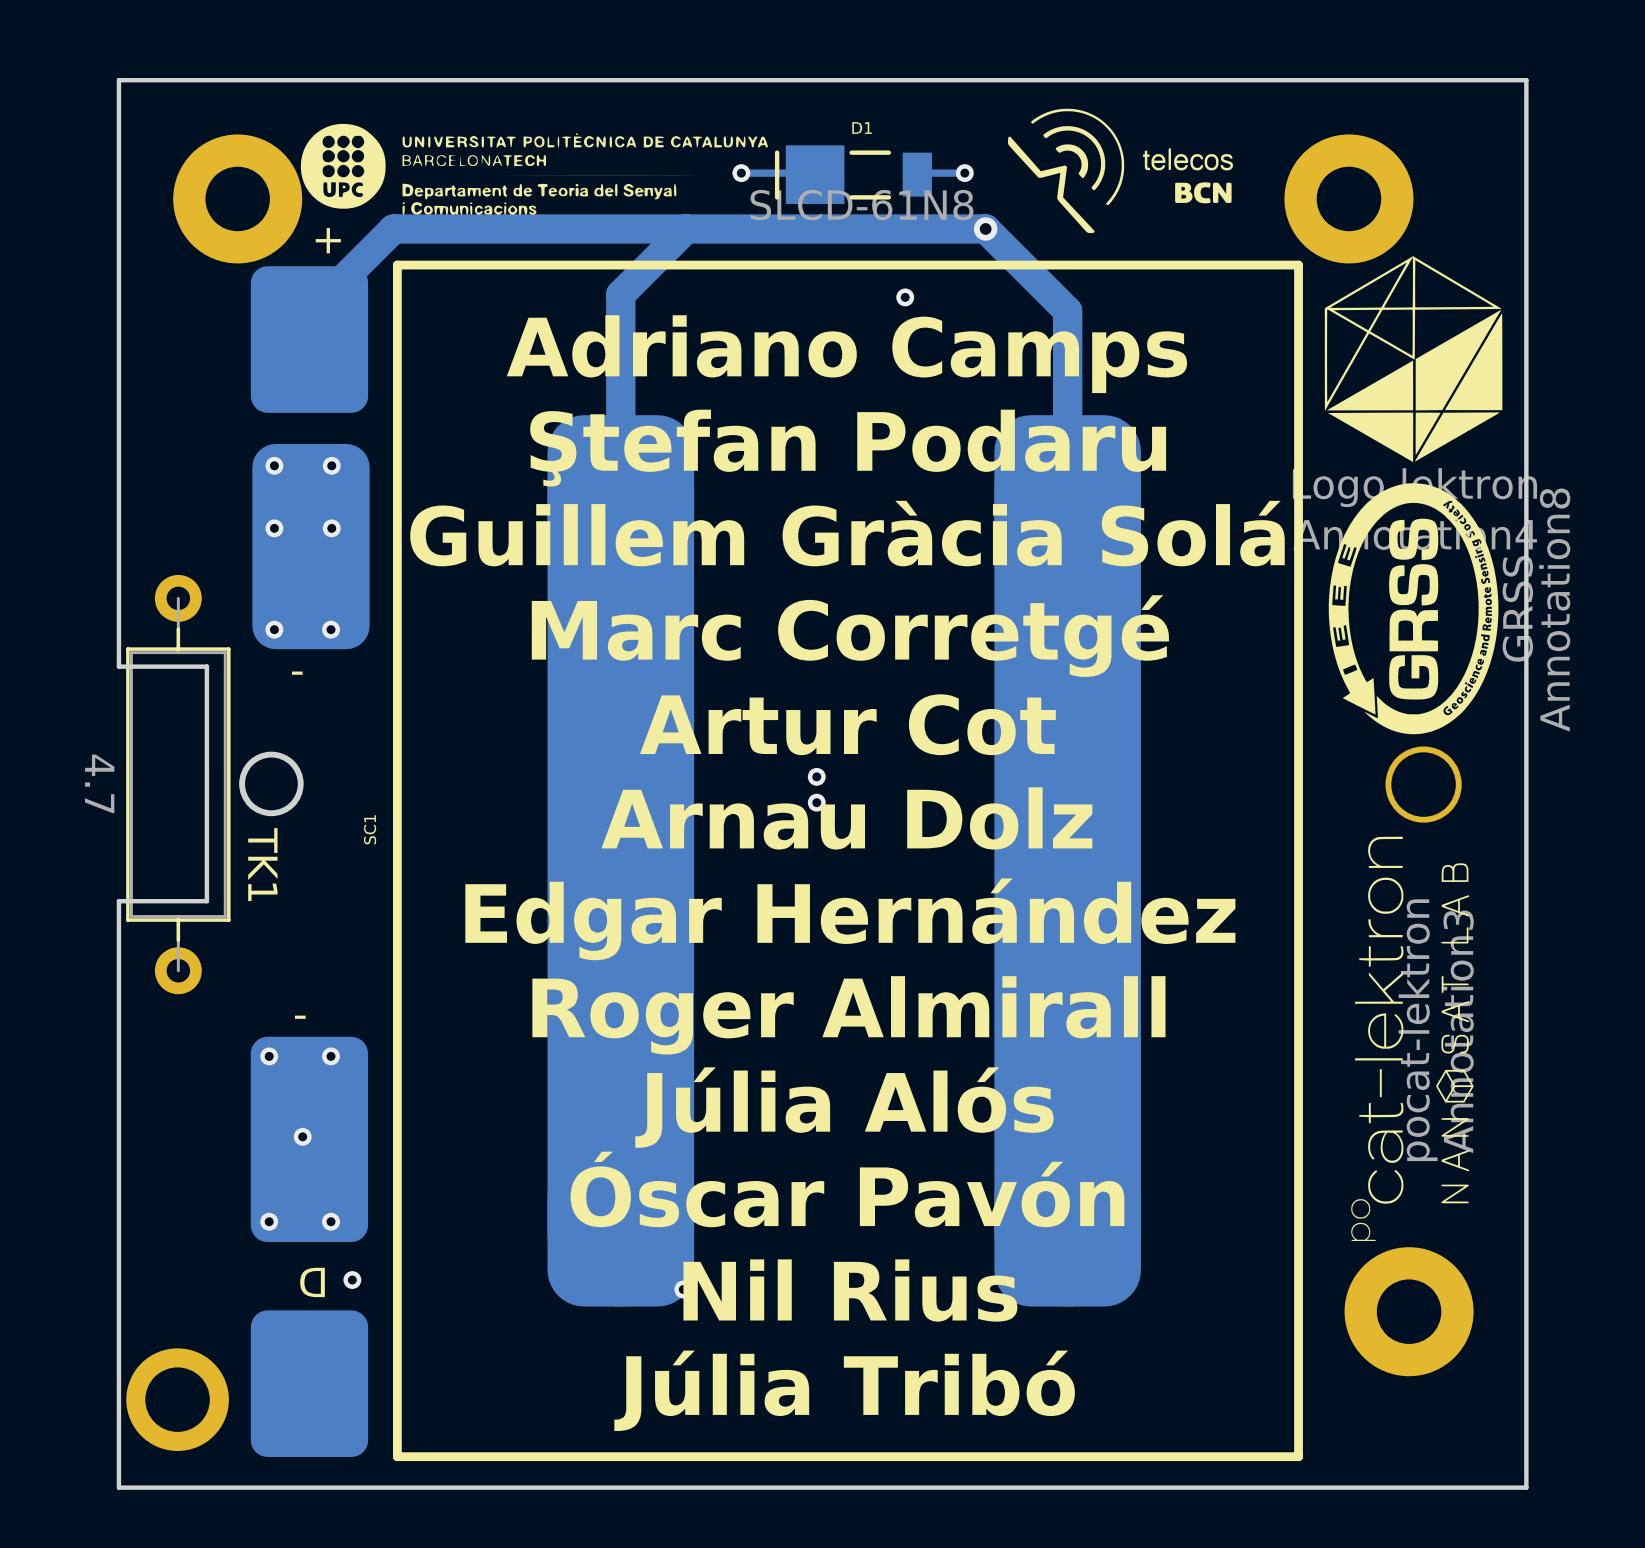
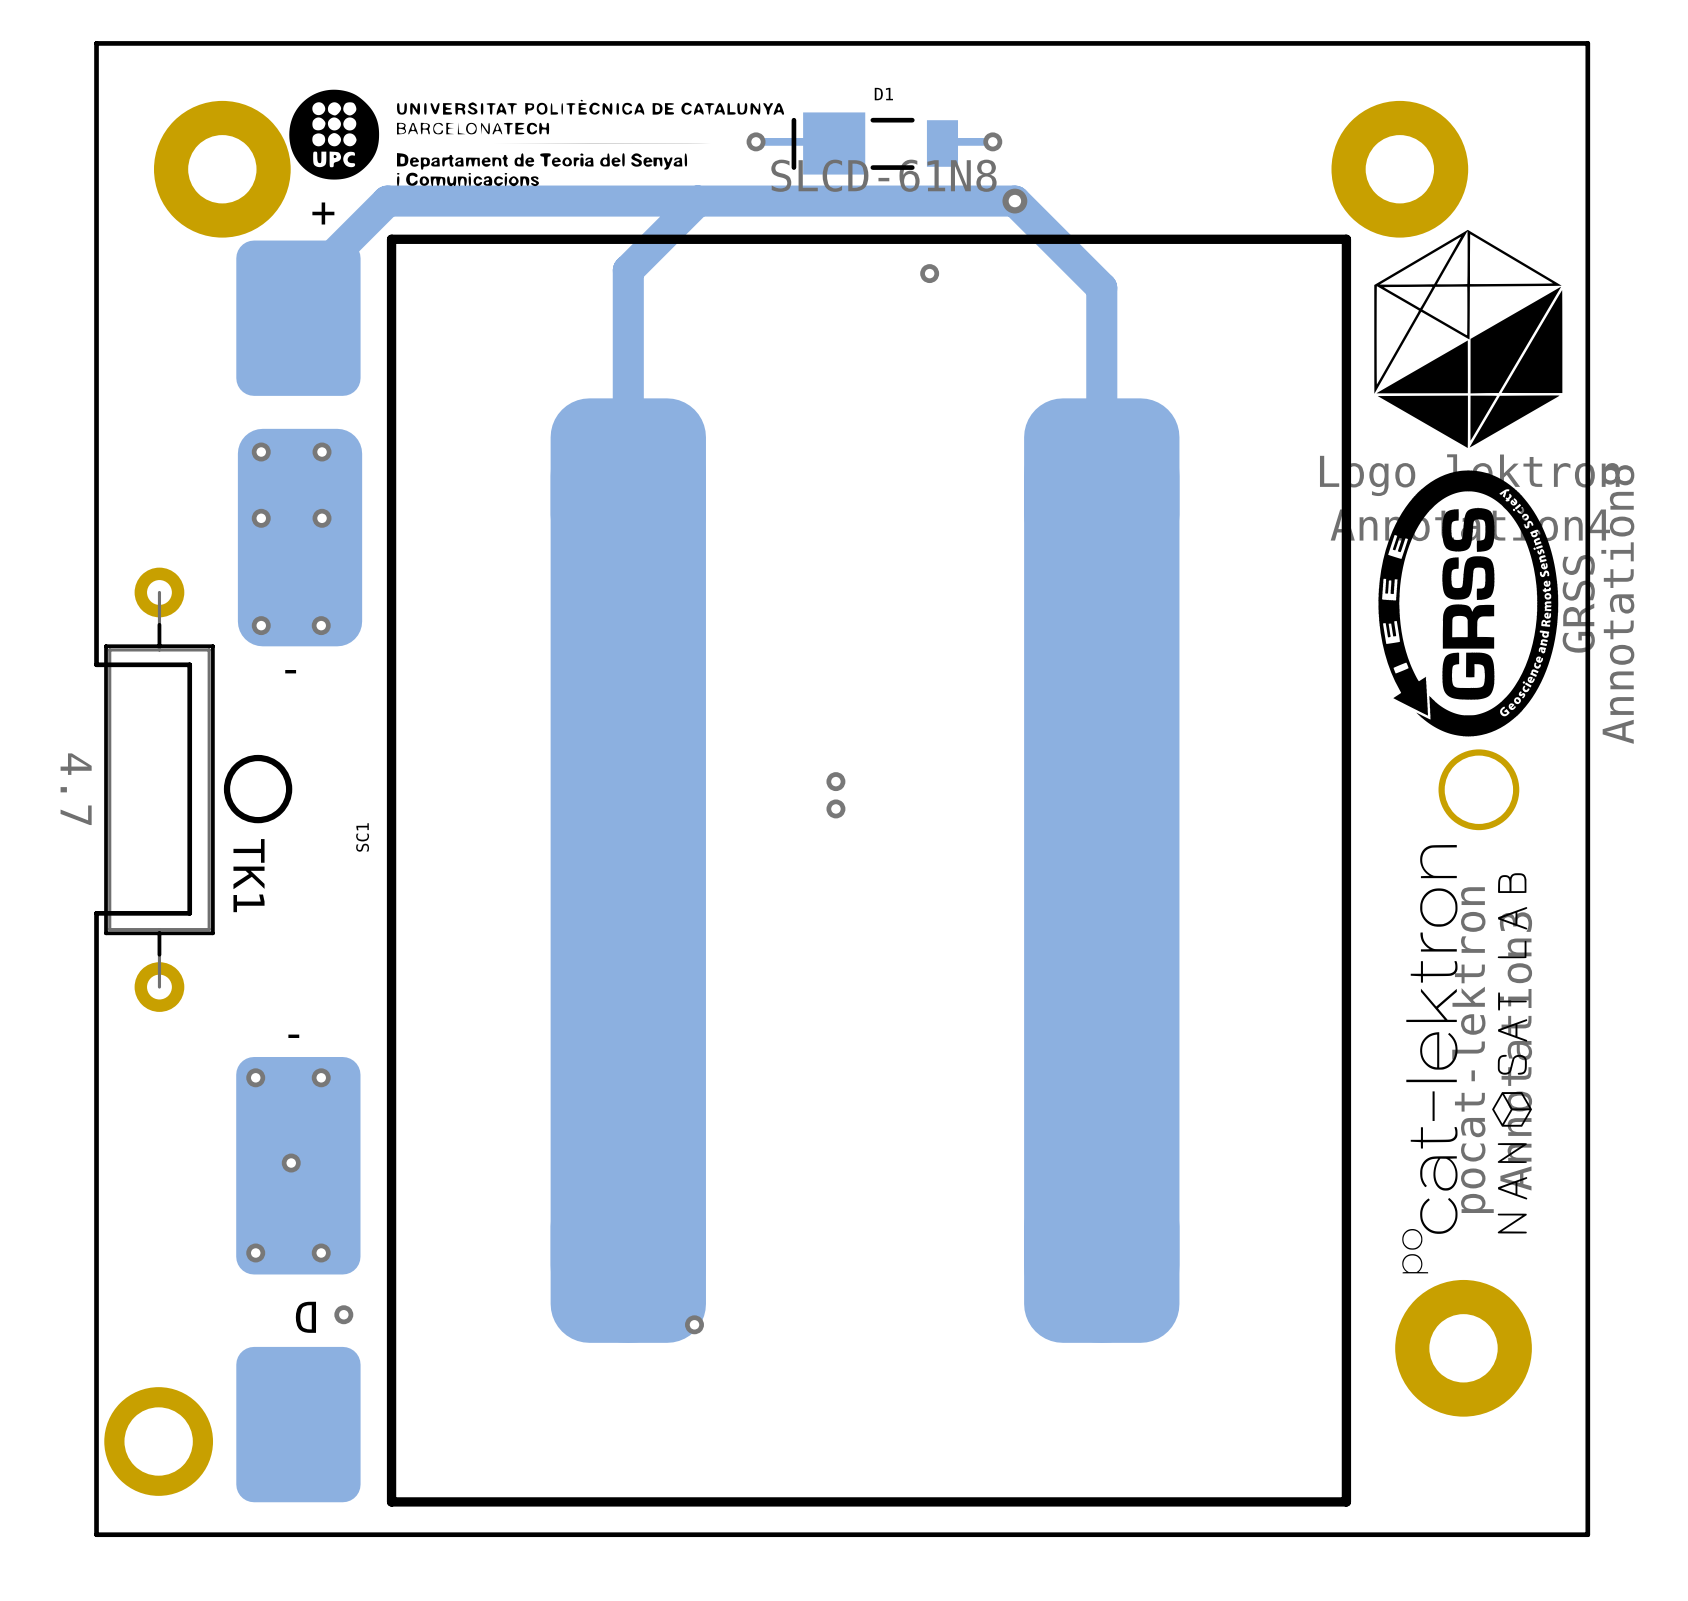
drawing: [1007, 108, 1233, 234] -> none
text: Adriano Camps (846, 354) -> none
text: Ştefan Podaru (848, 448) -> none
text: Guillem Gràcia Solá (847, 533) -> none
text: Marc Corretgé (850, 636) -> none
text: Artur Cot (847, 724) -> none
text: Arnau Dolz (846, 818) -> none
text: Edgar Hernández (850, 919) -> none
text: Roger Almirall (848, 1015) -> none
text: Júlia Alós (844, 1107) -> none
text: Óscar Pavón (847, 1189) -> none
text: Nil Rius (850, 1290) -> none
text: Júlia Tribó (844, 1390) -> none

